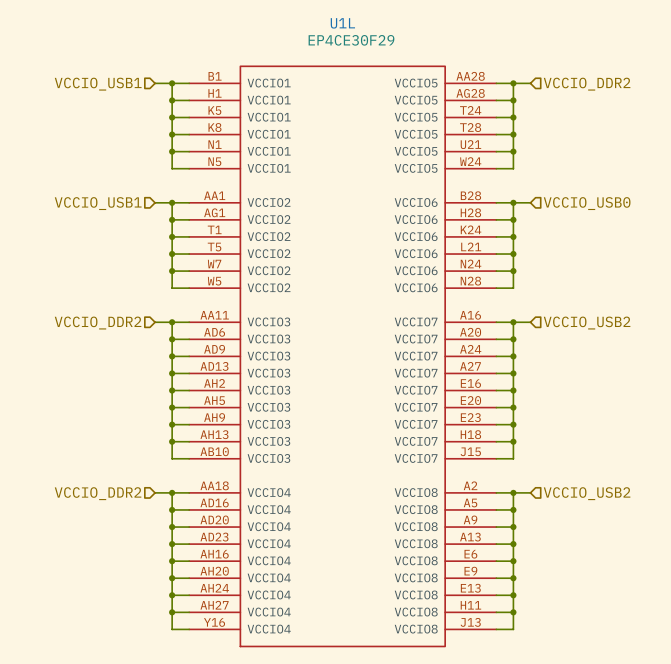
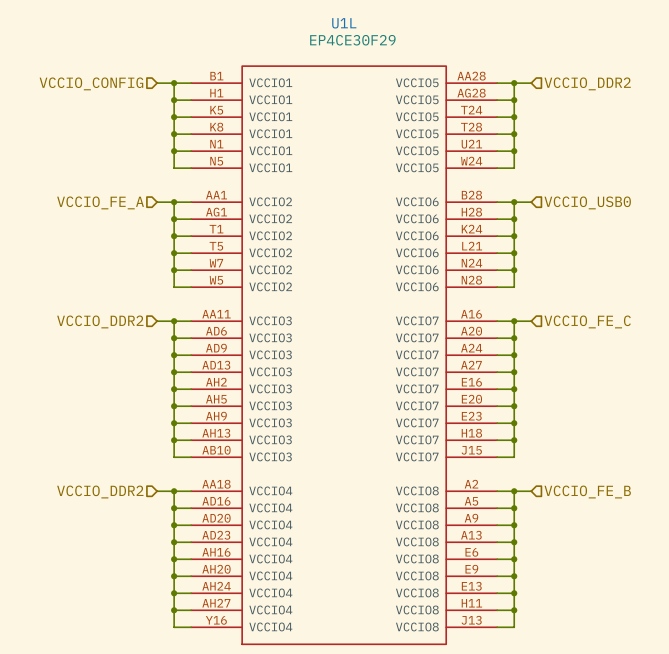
hierarchical label: VCCIO_USB1 (98, 84) -> VCCIO_CONFIG (91, 83)
hierarchical label: VCCIO_USB1 (98, 203) -> VCCIO_FE_A (100, 202)
hierarchical label: VCCIO_USB2 (587, 323) -> VCCIO_FE_C (587, 321)
hierarchical label: VCCIO_USB2 (587, 493) -> VCCIO_FE_B (587, 492)

